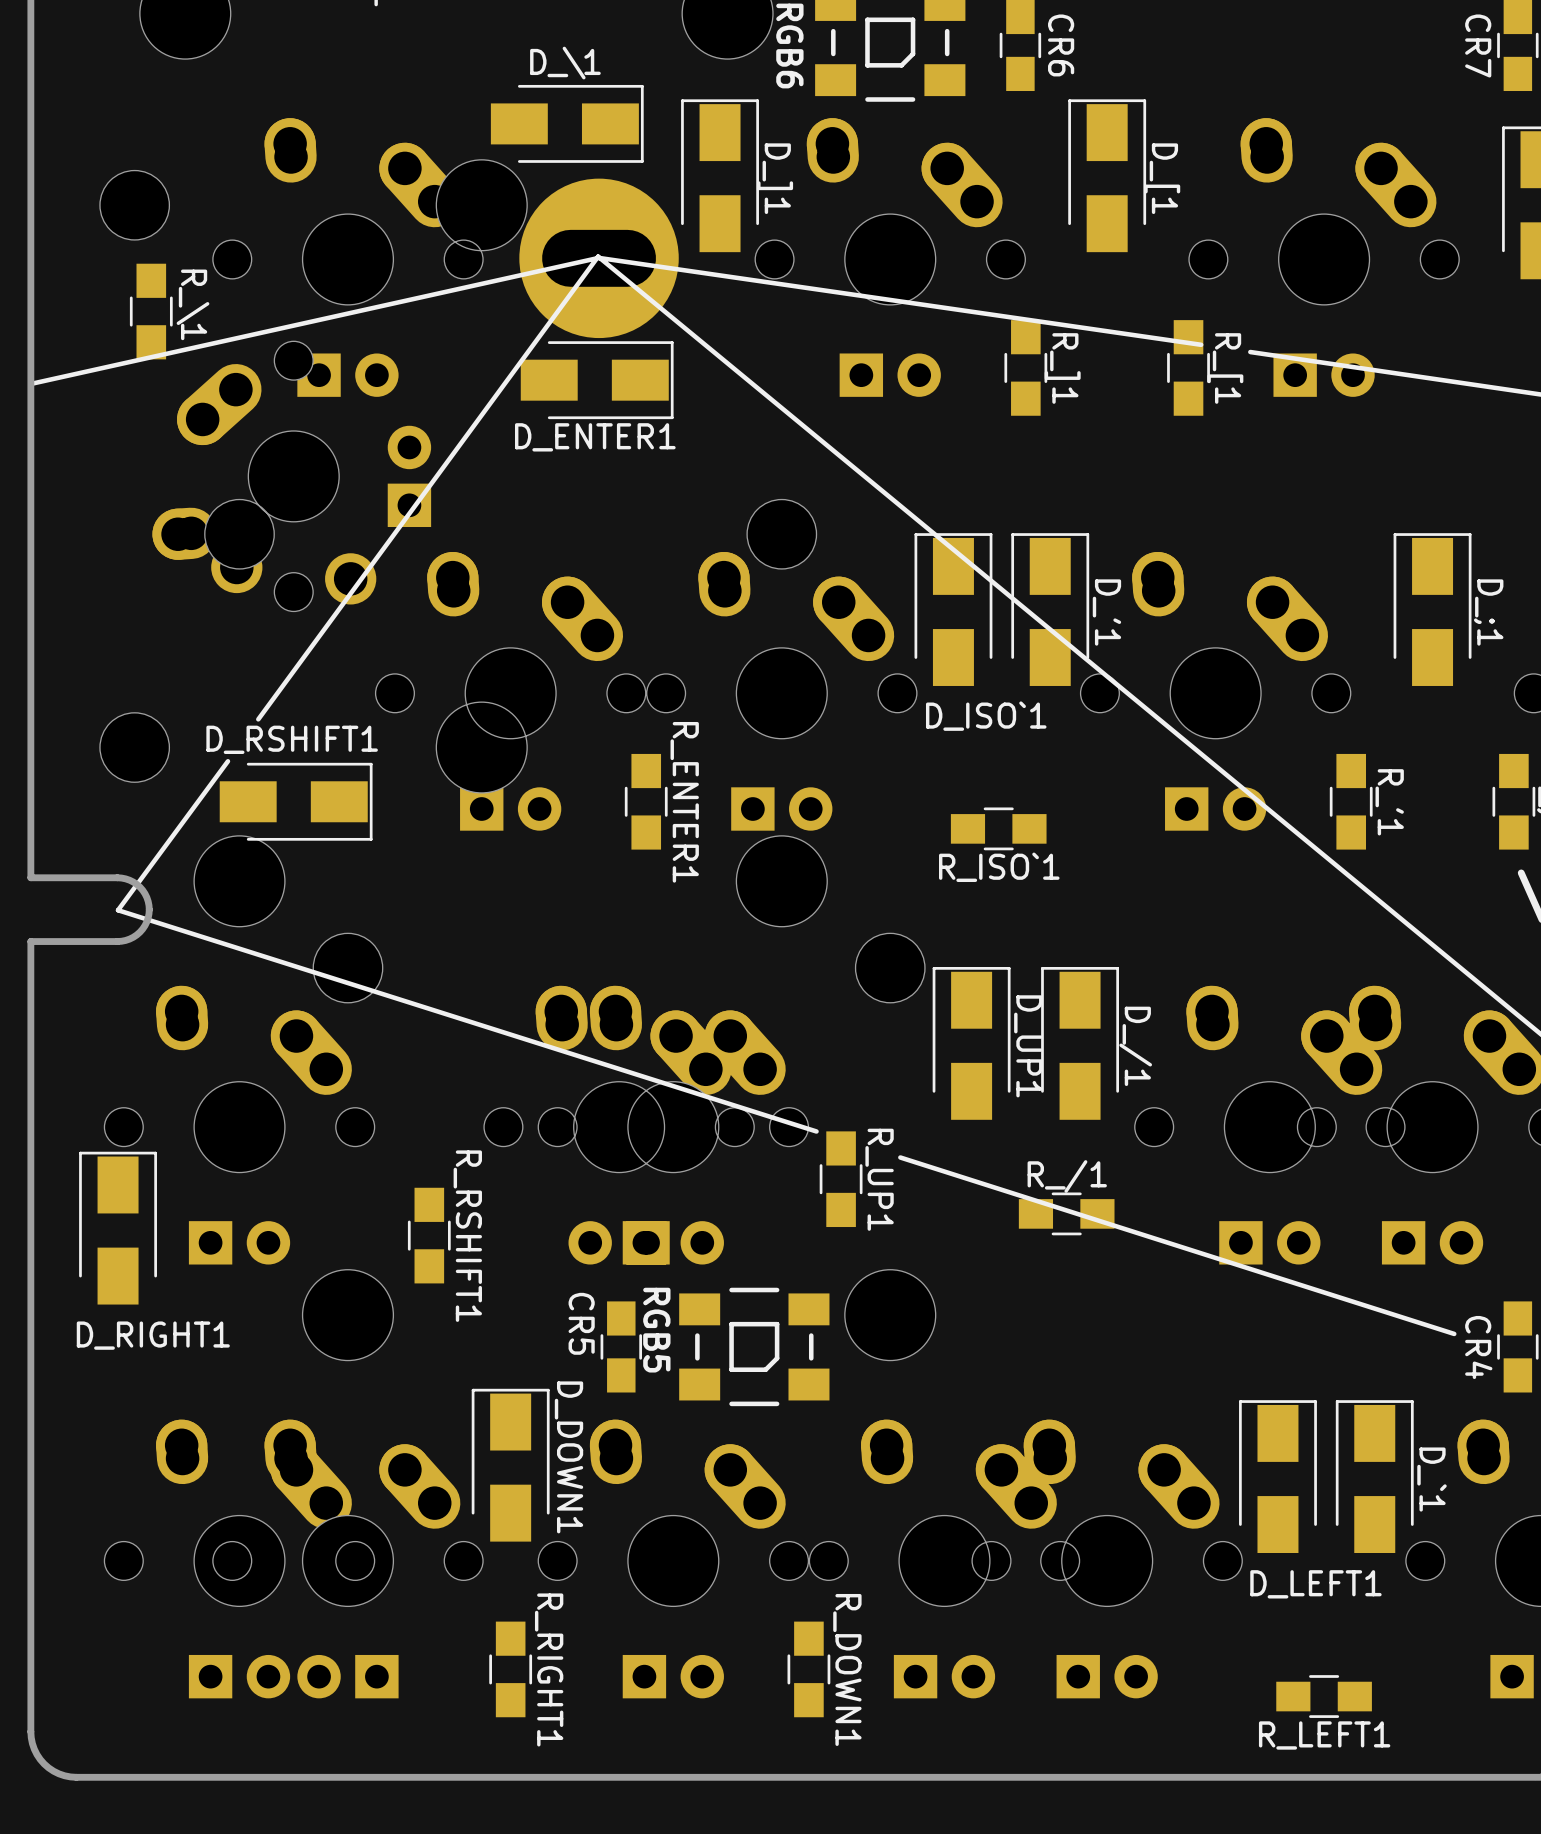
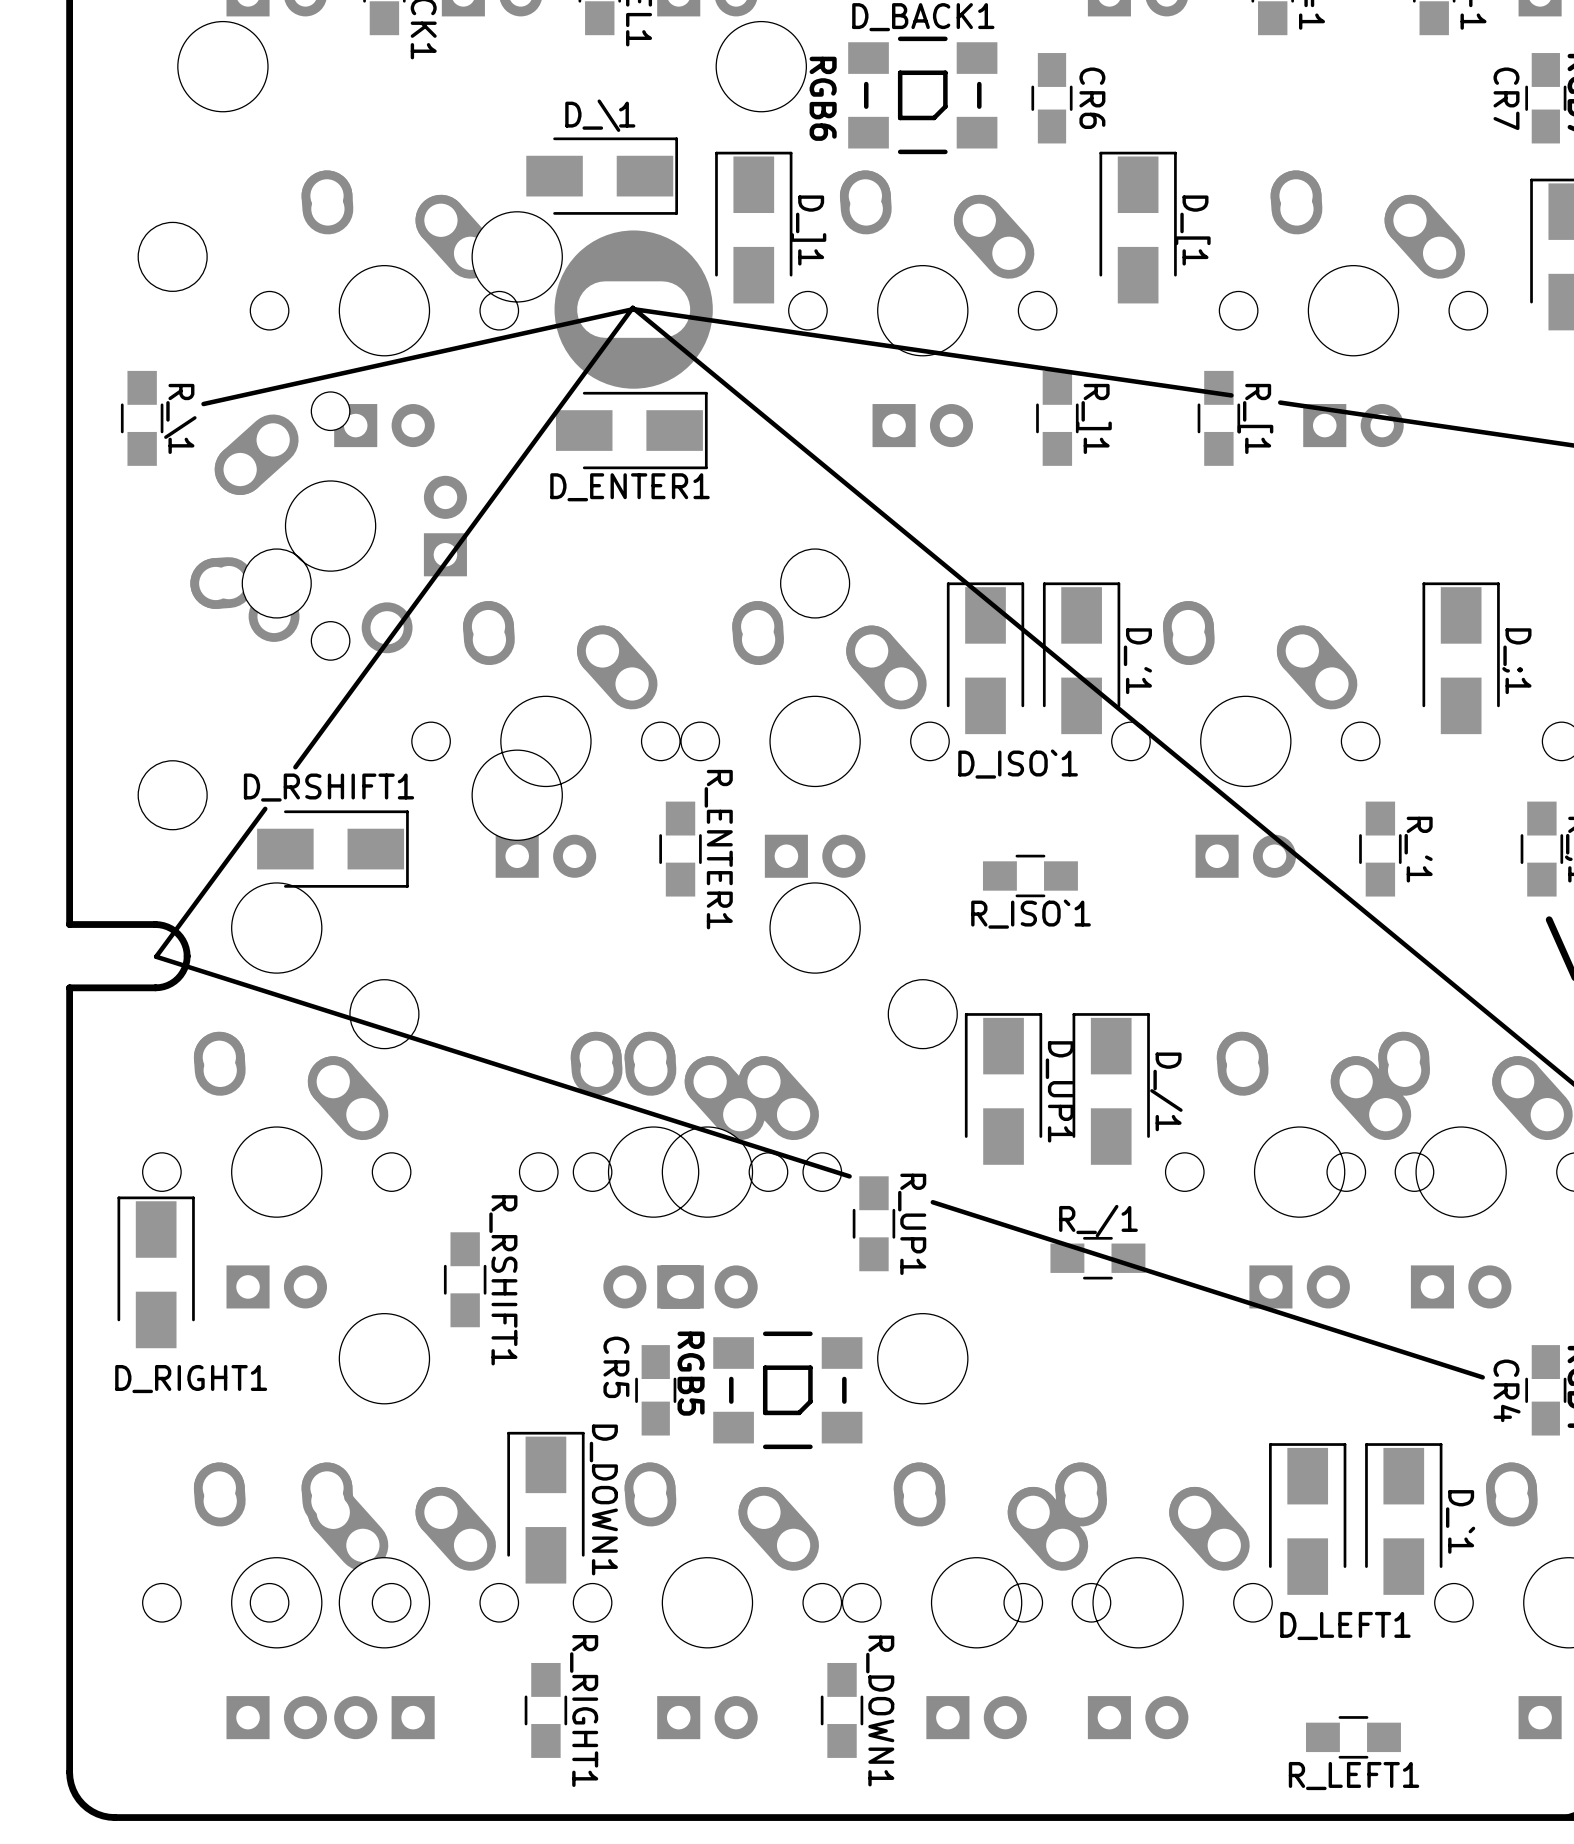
line: (598, 258) (31, 383) -> (632, 309) (203, 404)
R_\1 name position: R_\1 (193, 304) -> R_\1 (180, 418)
R_\1 position: (151, 311) -> (142, 418)

